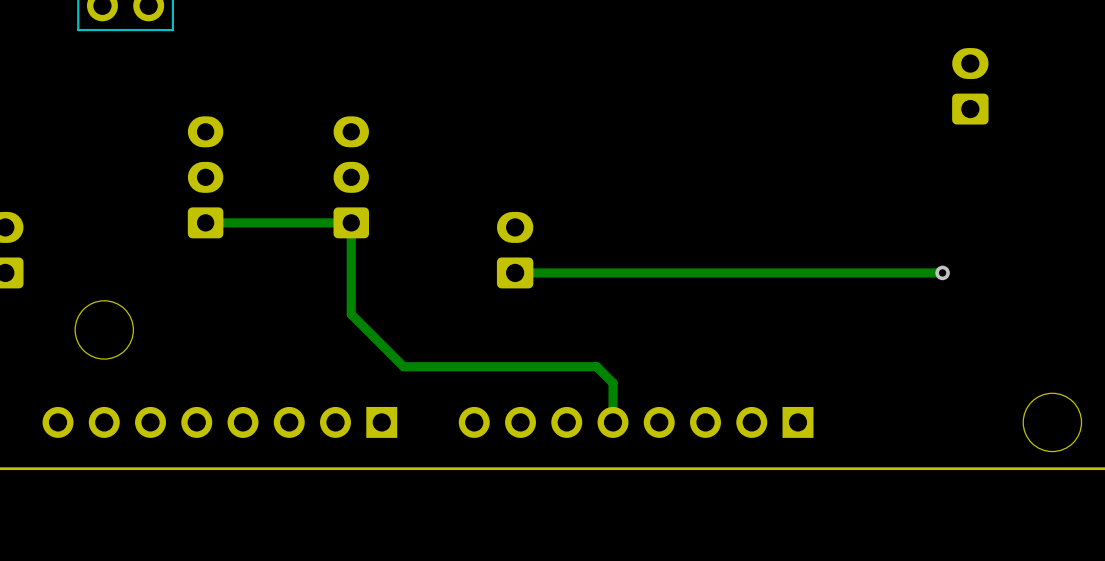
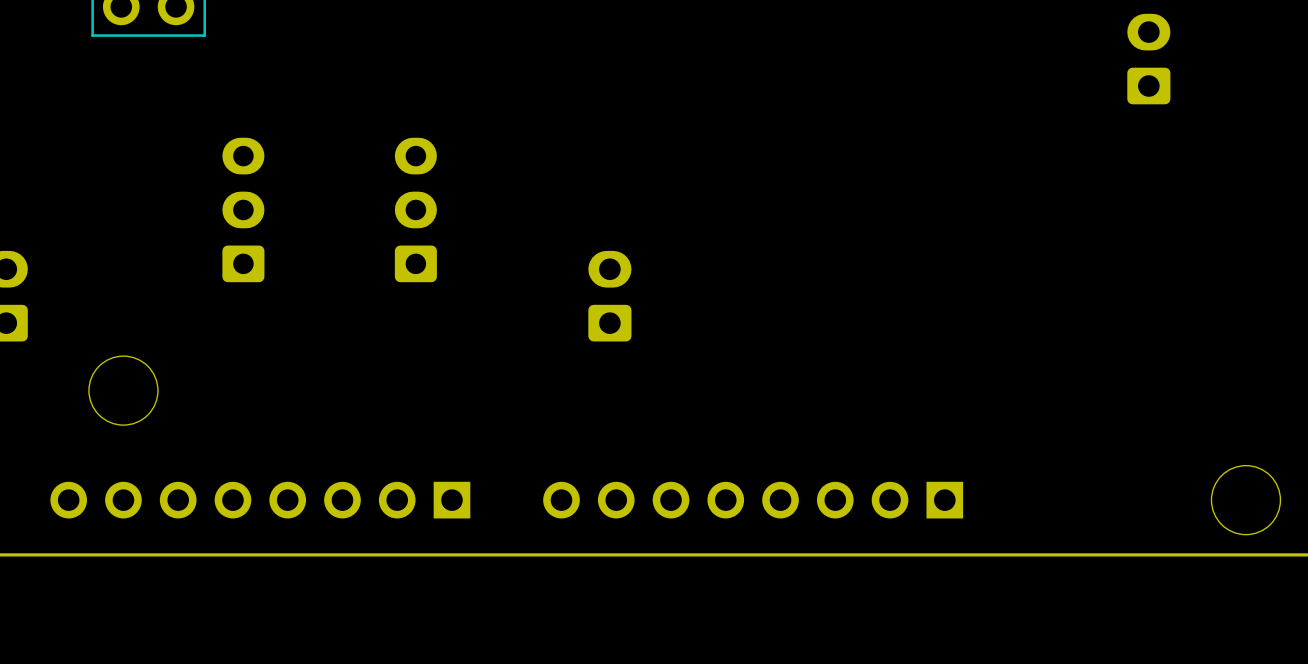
part position: (970, 86) -> (1148, 59)
track: (205, 222) (351, 222) (351, 314) (403, 366) (596, 366) (613, 383) (613, 422) -> none
track: (942, 272) (515, 272) -> none
via: (942, 272) -> none

